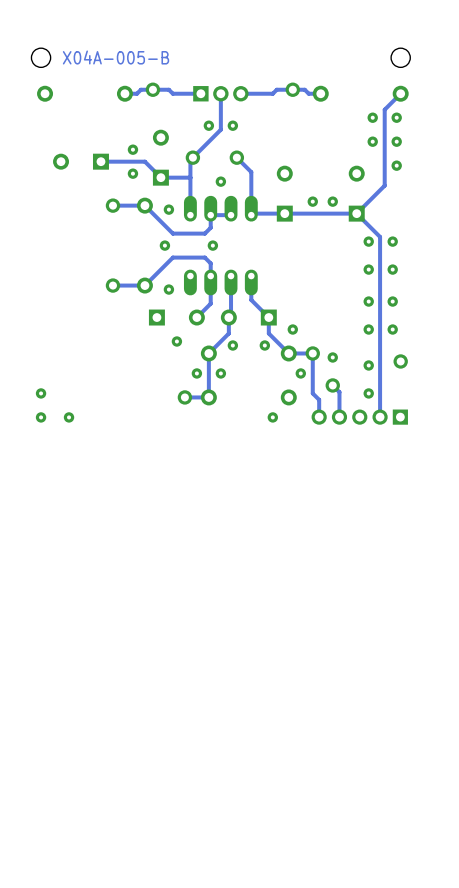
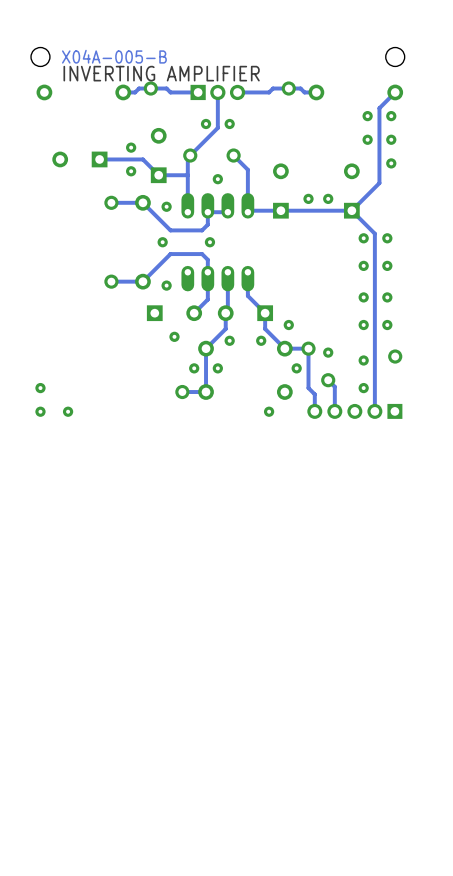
text: none -> INVERTING AMPLIFIER (161, 73)

